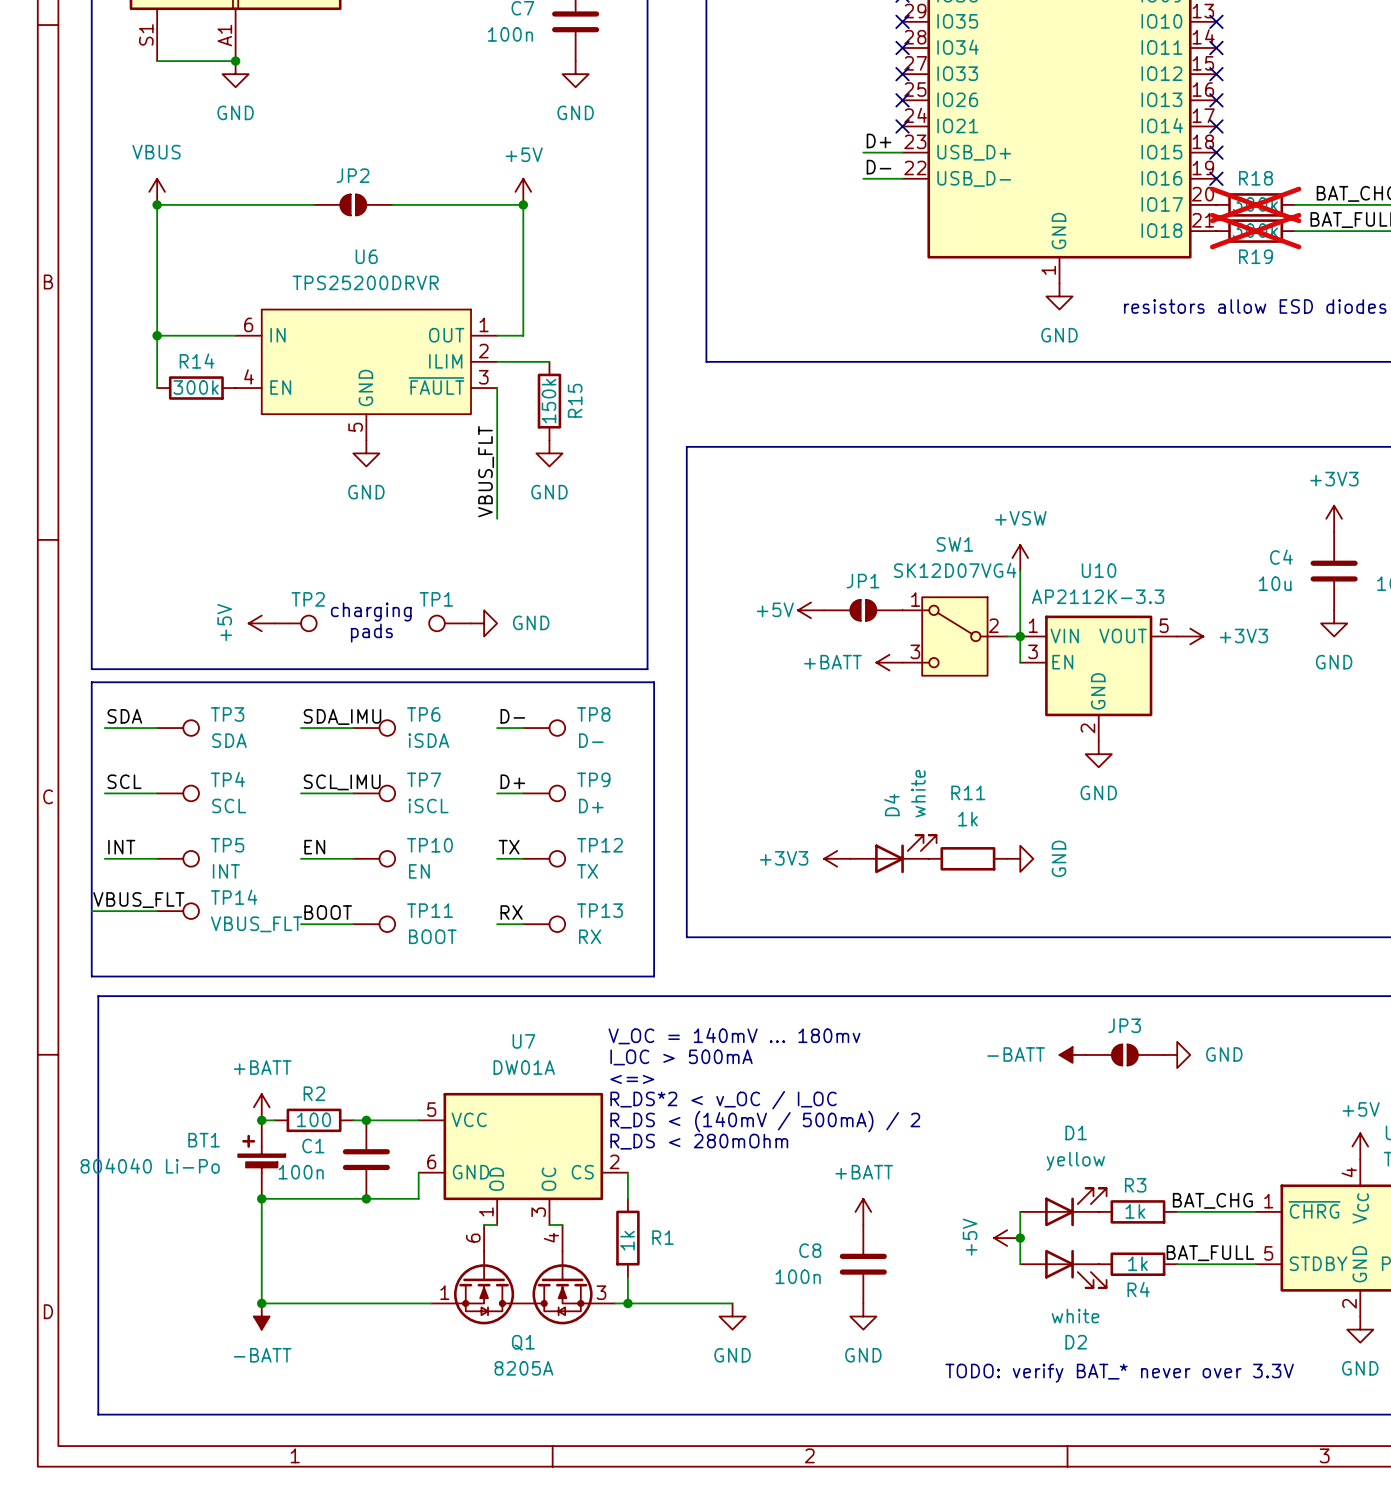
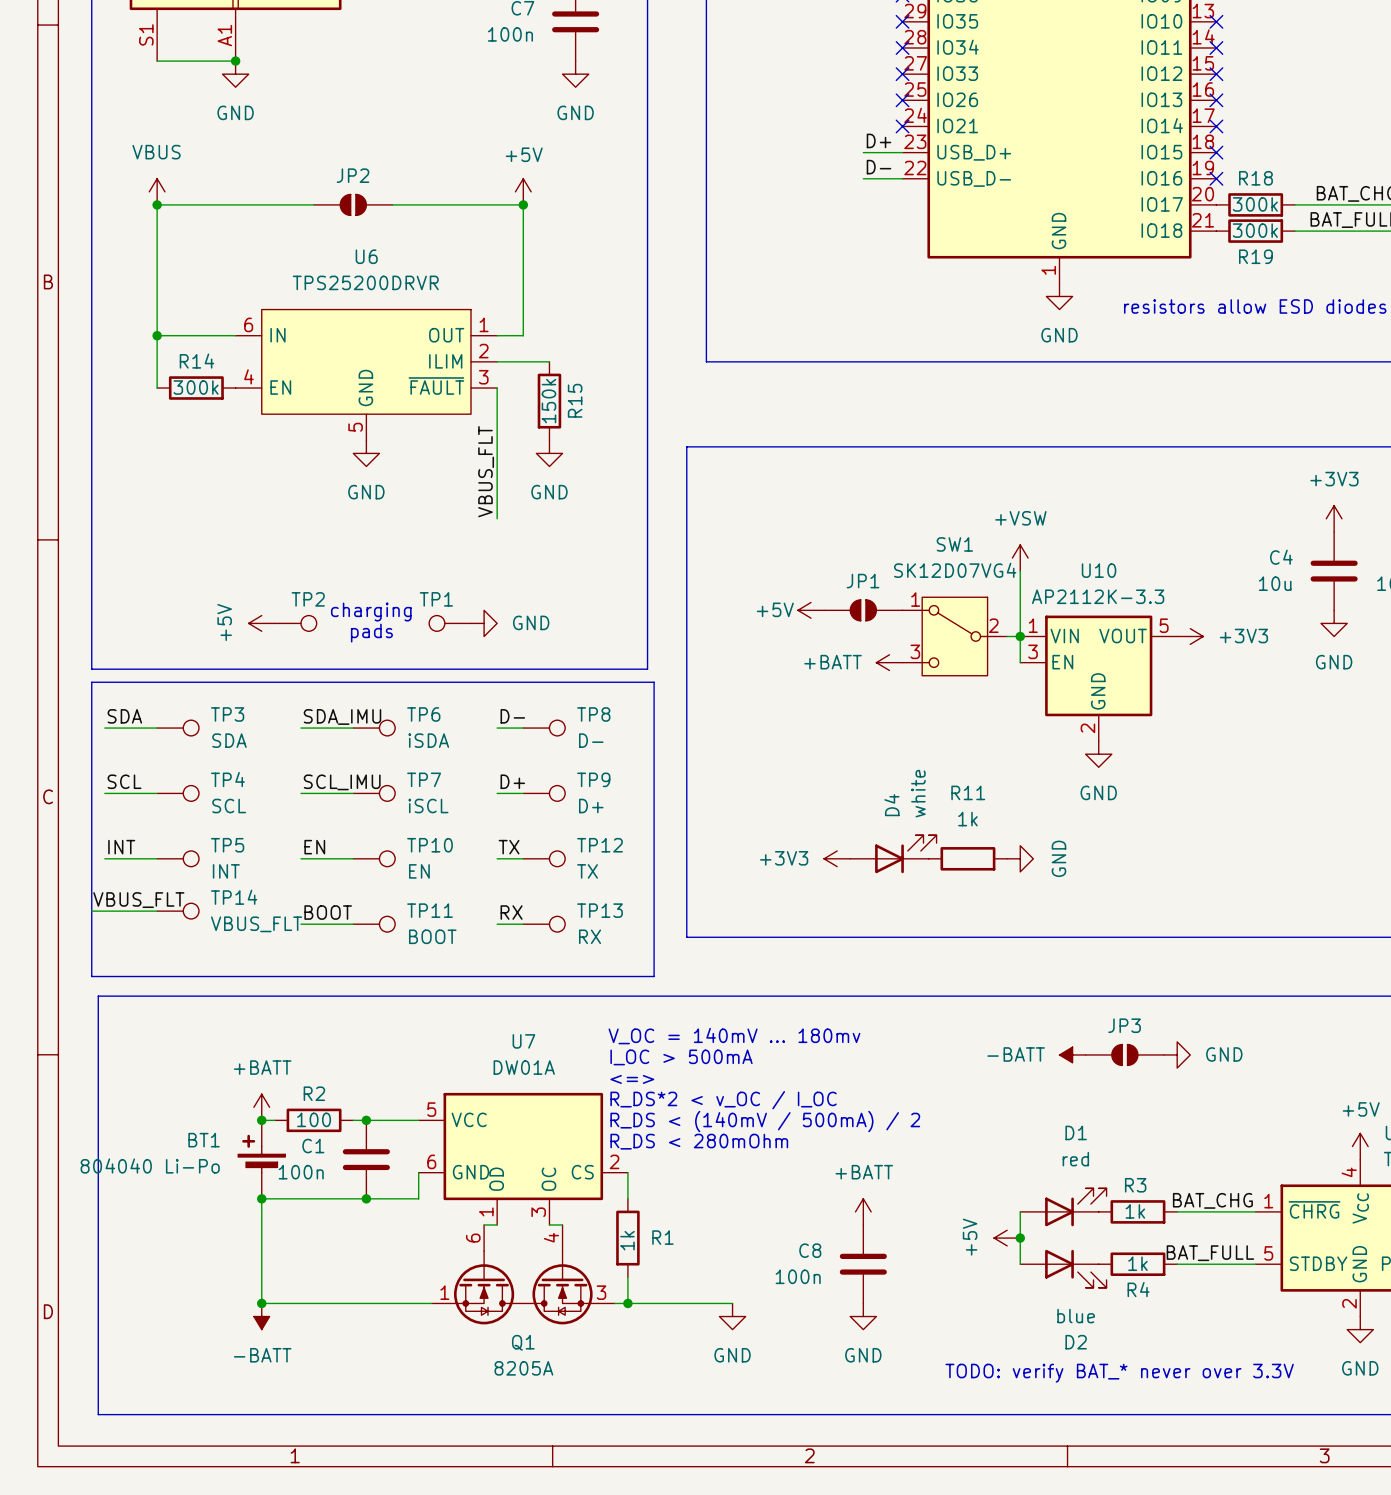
R18 do-not-place cross: (1255, 204) -> none
R19 do-not-place cross: (1255, 231) -> none
D1 value: yellow (1075, 1161) -> red (1075, 1159)
D2 value: white (1075, 1316) -> blue (1076, 1316)

